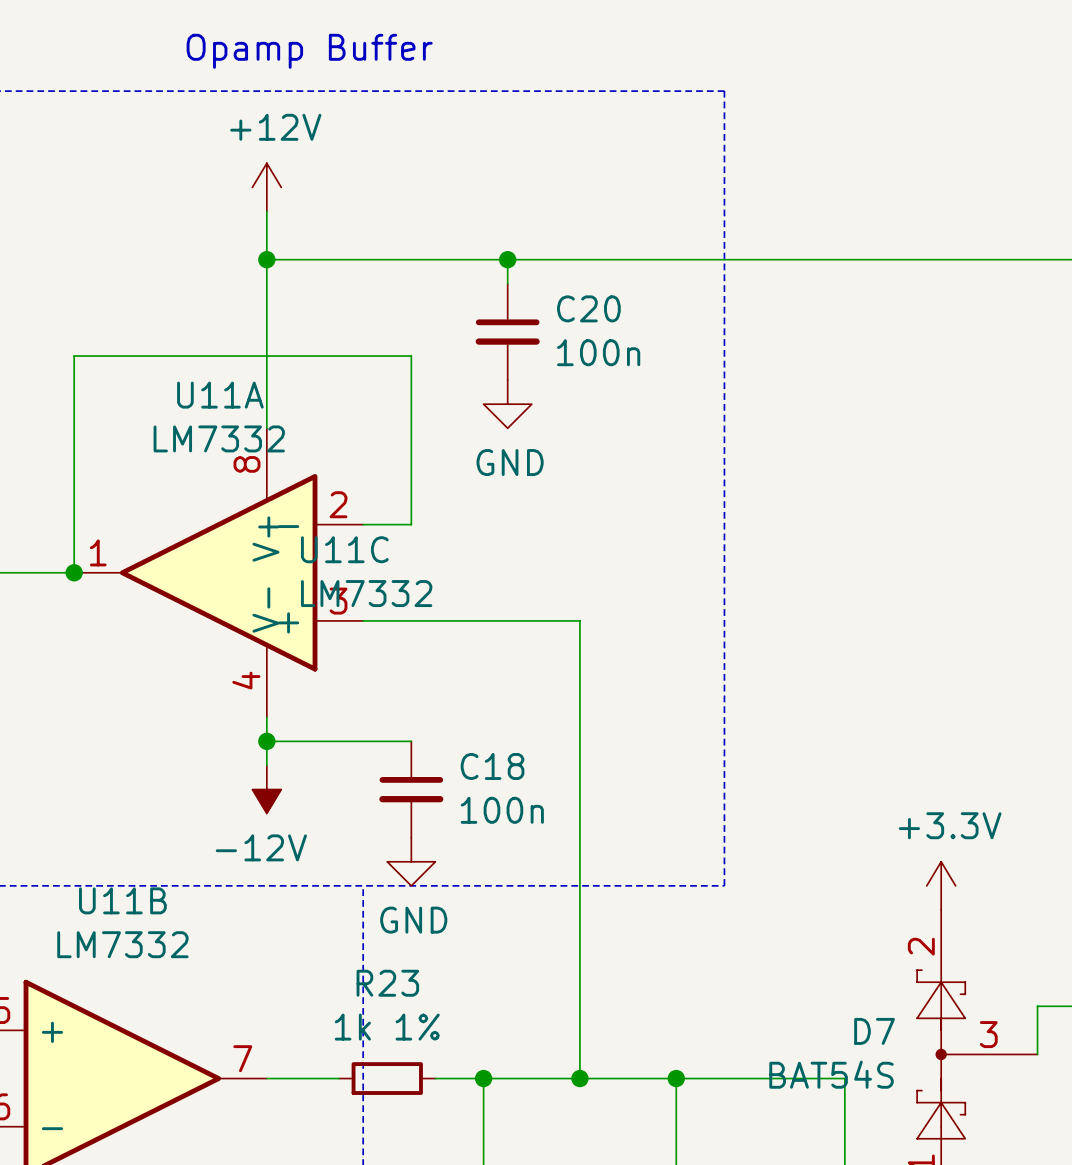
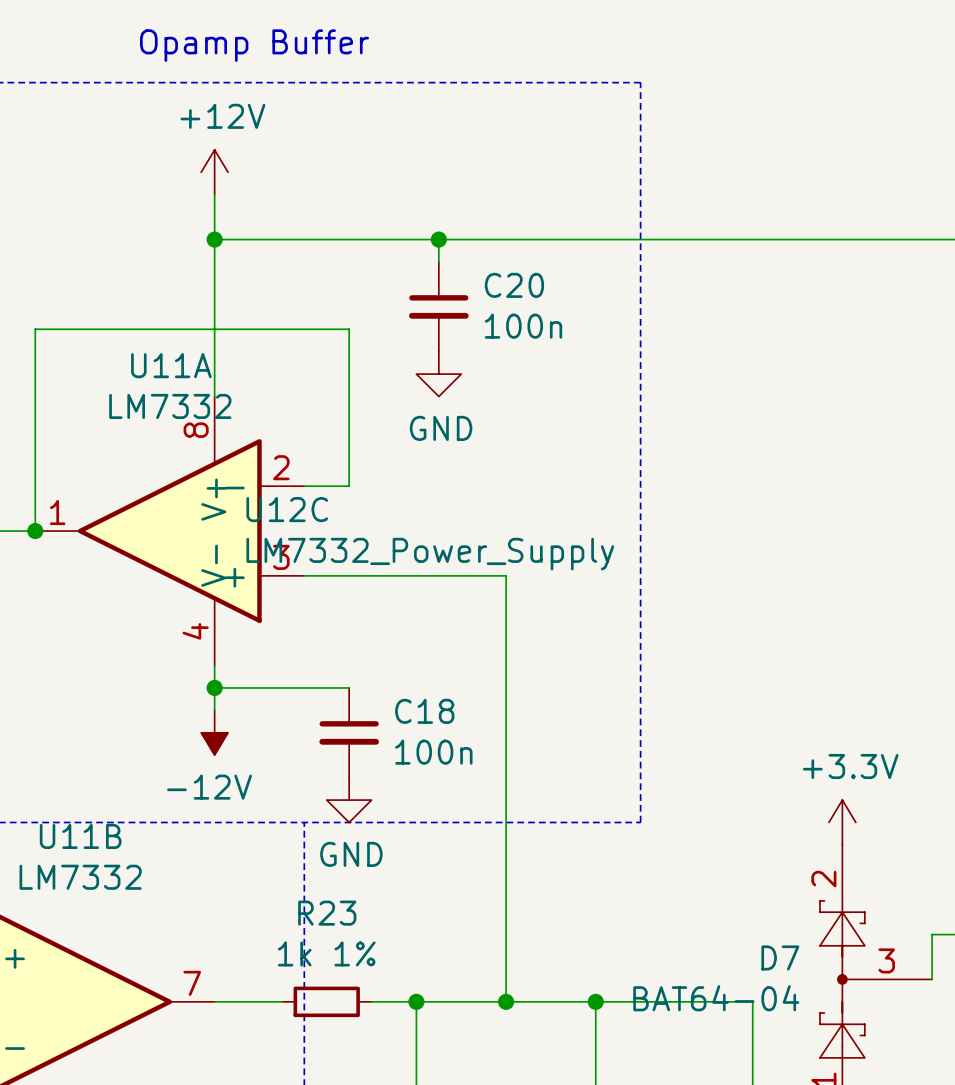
U11C name: U11C (344, 549) -> U12C (287, 509)
U11C value: LM7332 (366, 593) -> LM7332_Power_Supply (430, 554)
D7 value: BAT54S (831, 1074) -> BAT64-04 (716, 998)

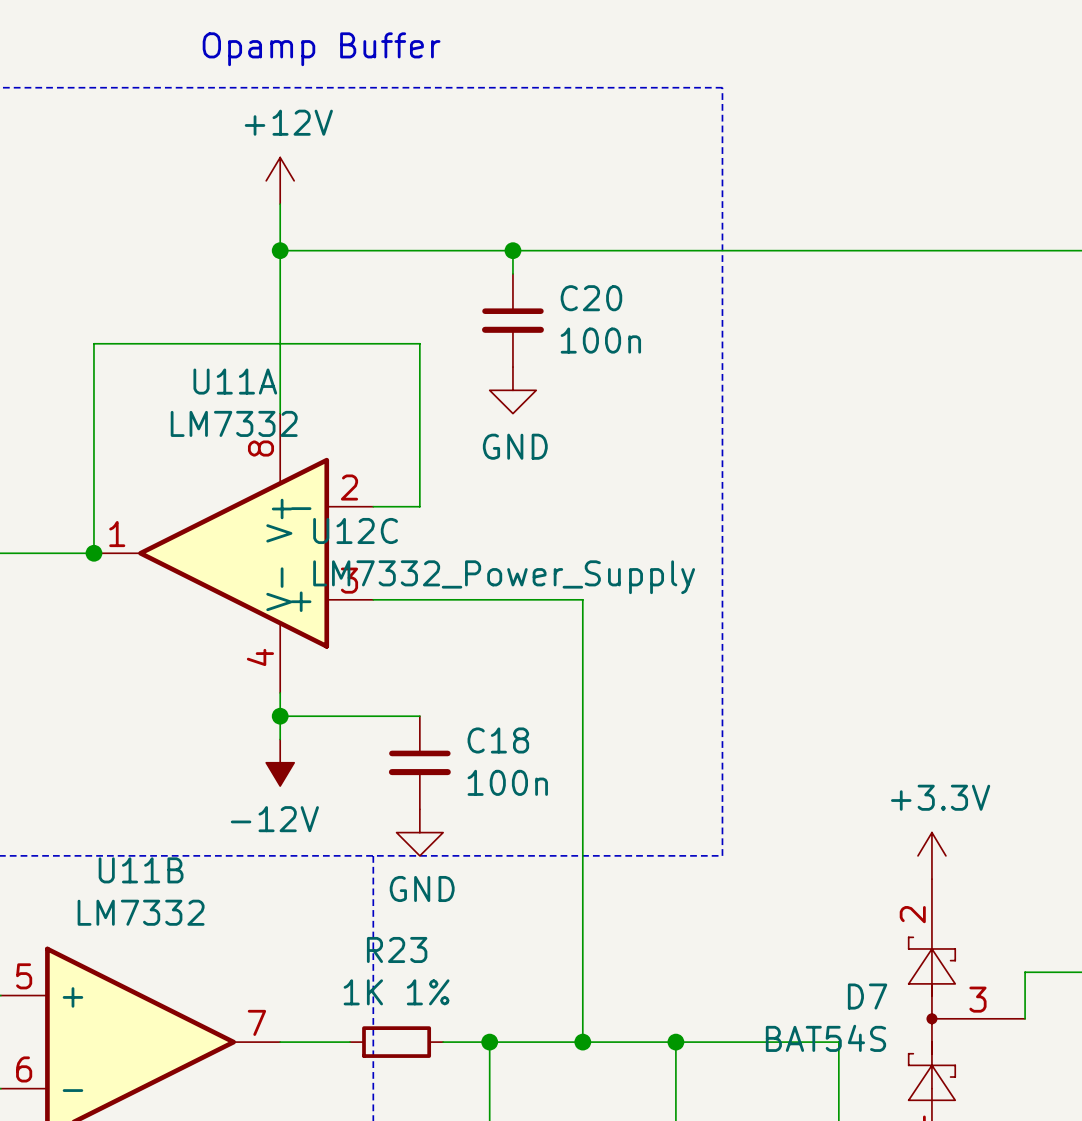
R23 value: 1k 1% (326, 953) -> 1K 1% (396, 992)
D7 value: BAT64-04 (716, 998) -> BAT54S (825, 1038)

